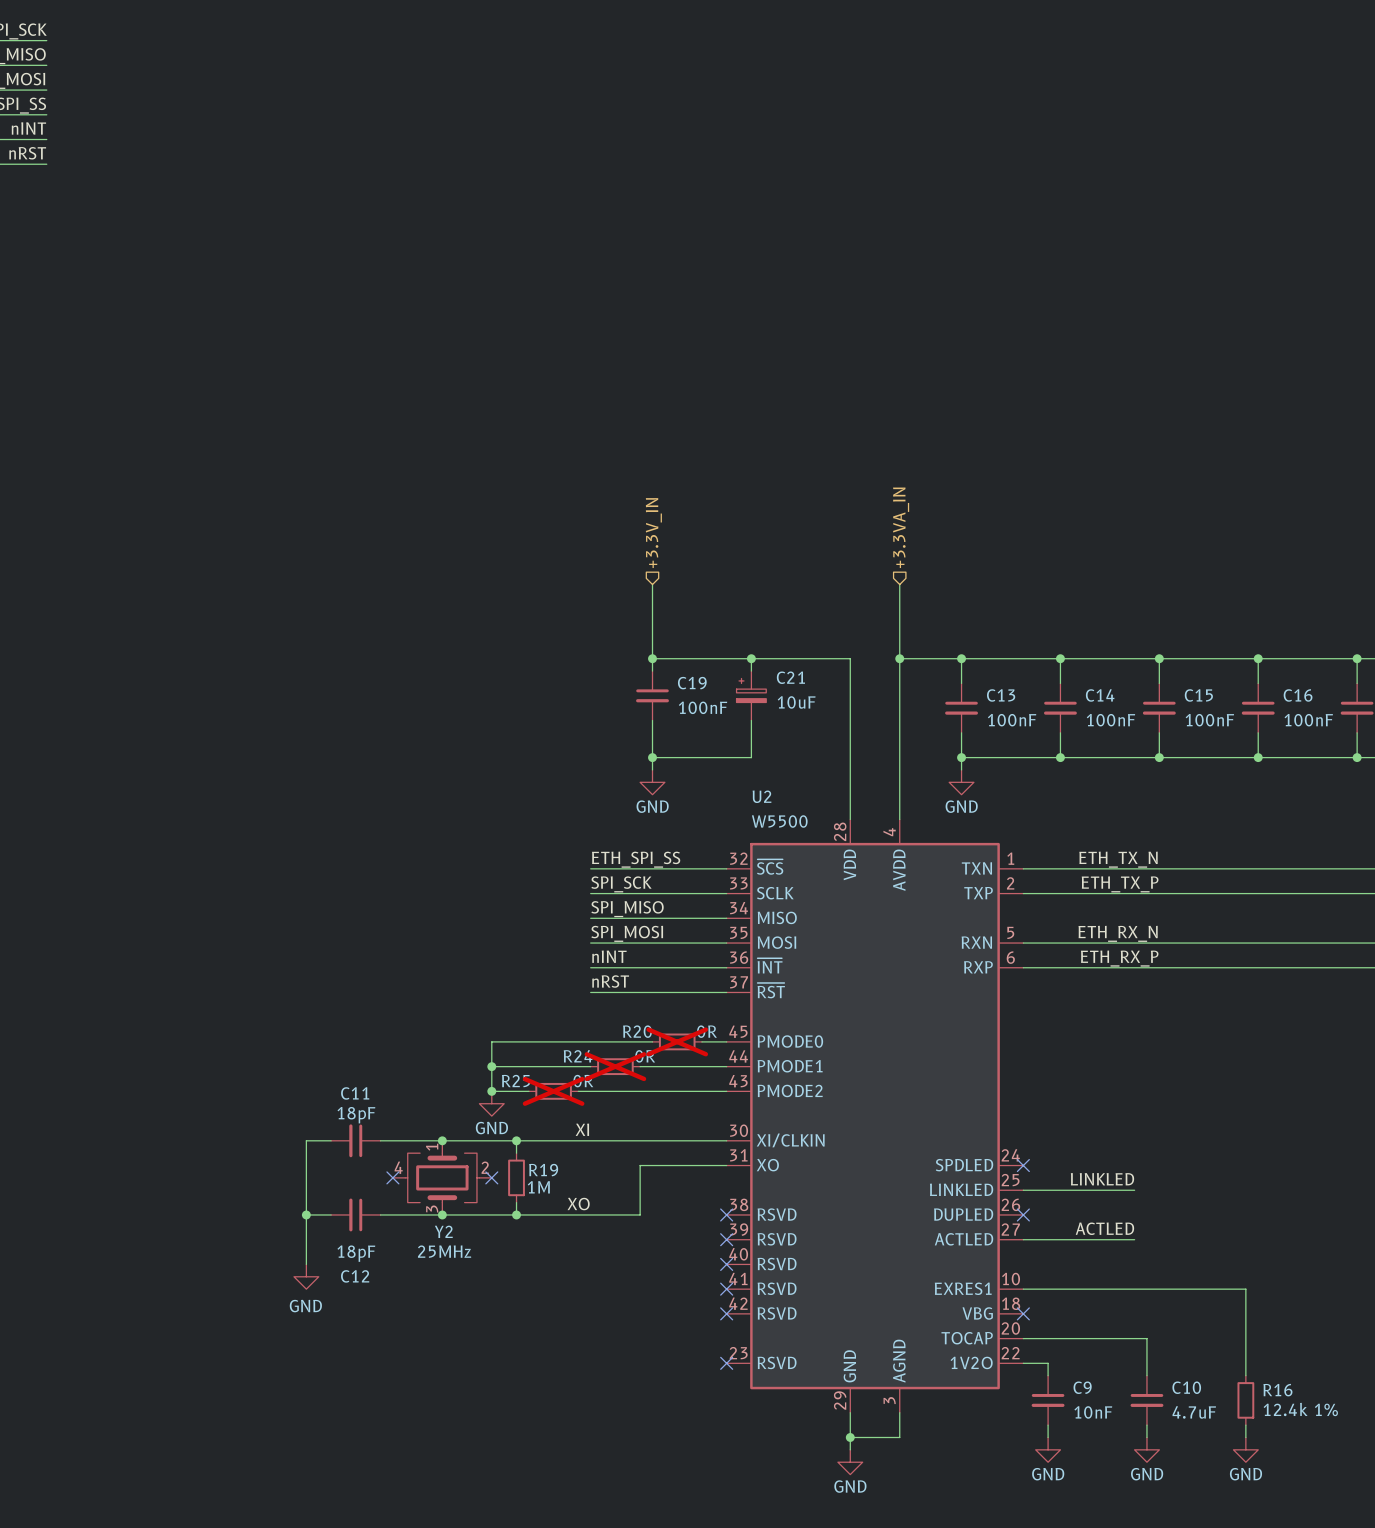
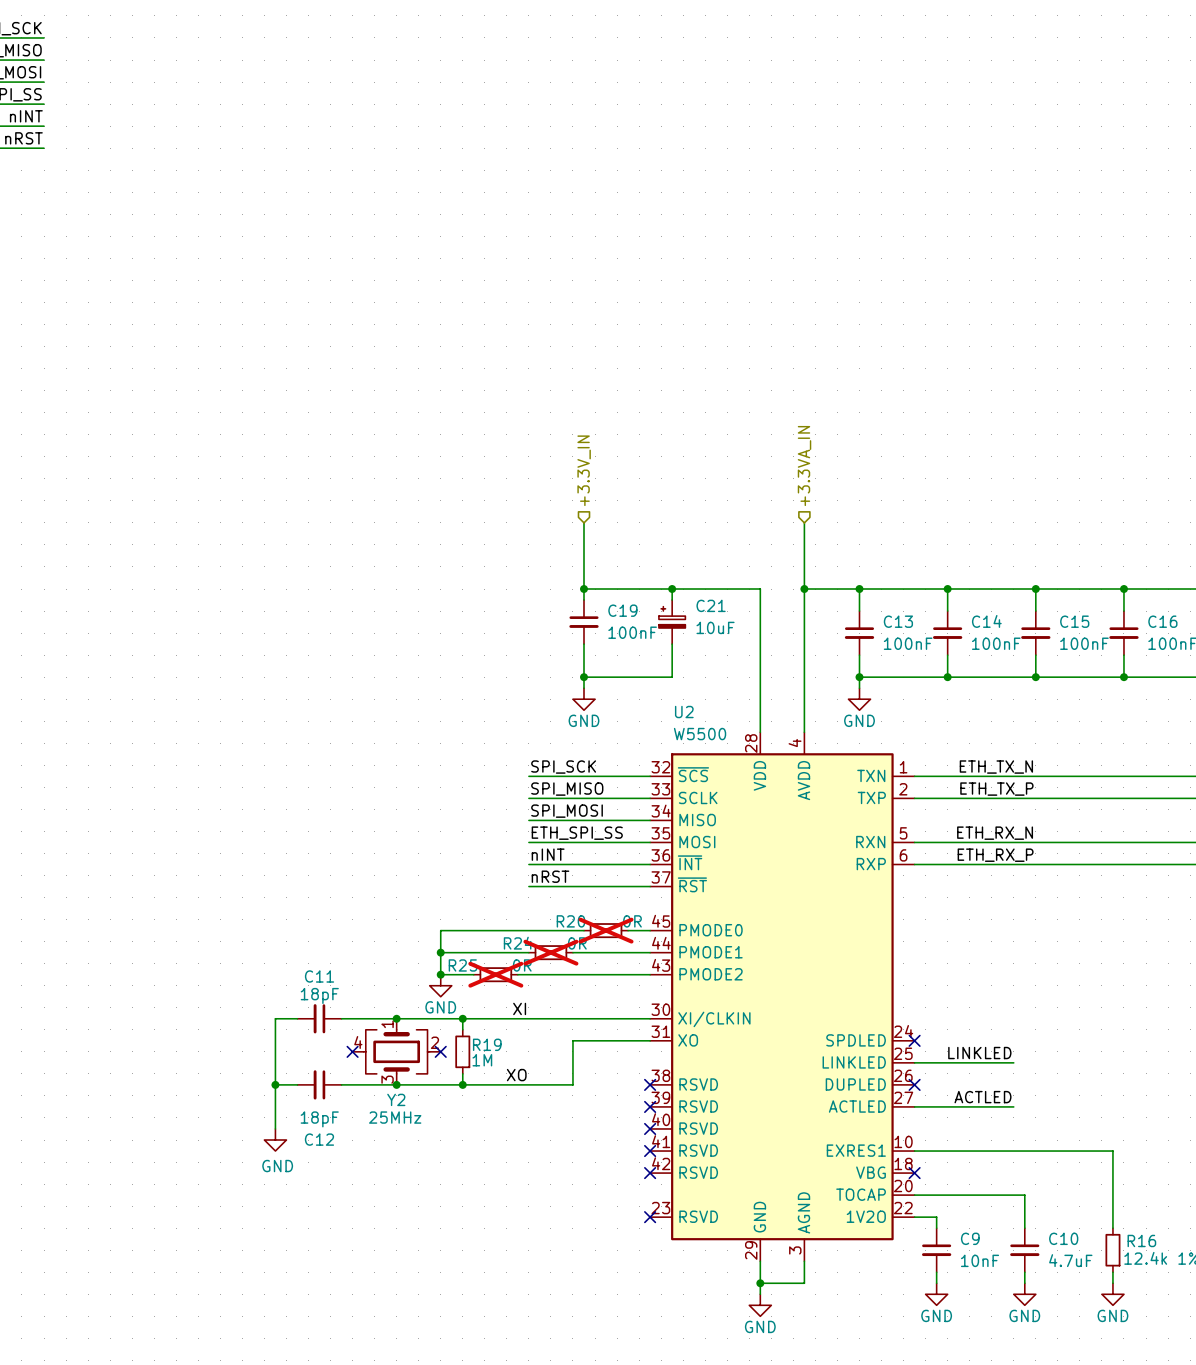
label: ETH_SPI_SS (636, 859) -> SPI_SCK (563, 767)
label: SPI_SCK (621, 884) -> SPI_MISO (567, 789)
label: SPI_MISO (627, 909) -> SPI_MOSI (567, 811)
label: SPI_MOSI (627, 933) -> ETH_SPI_SS (577, 833)

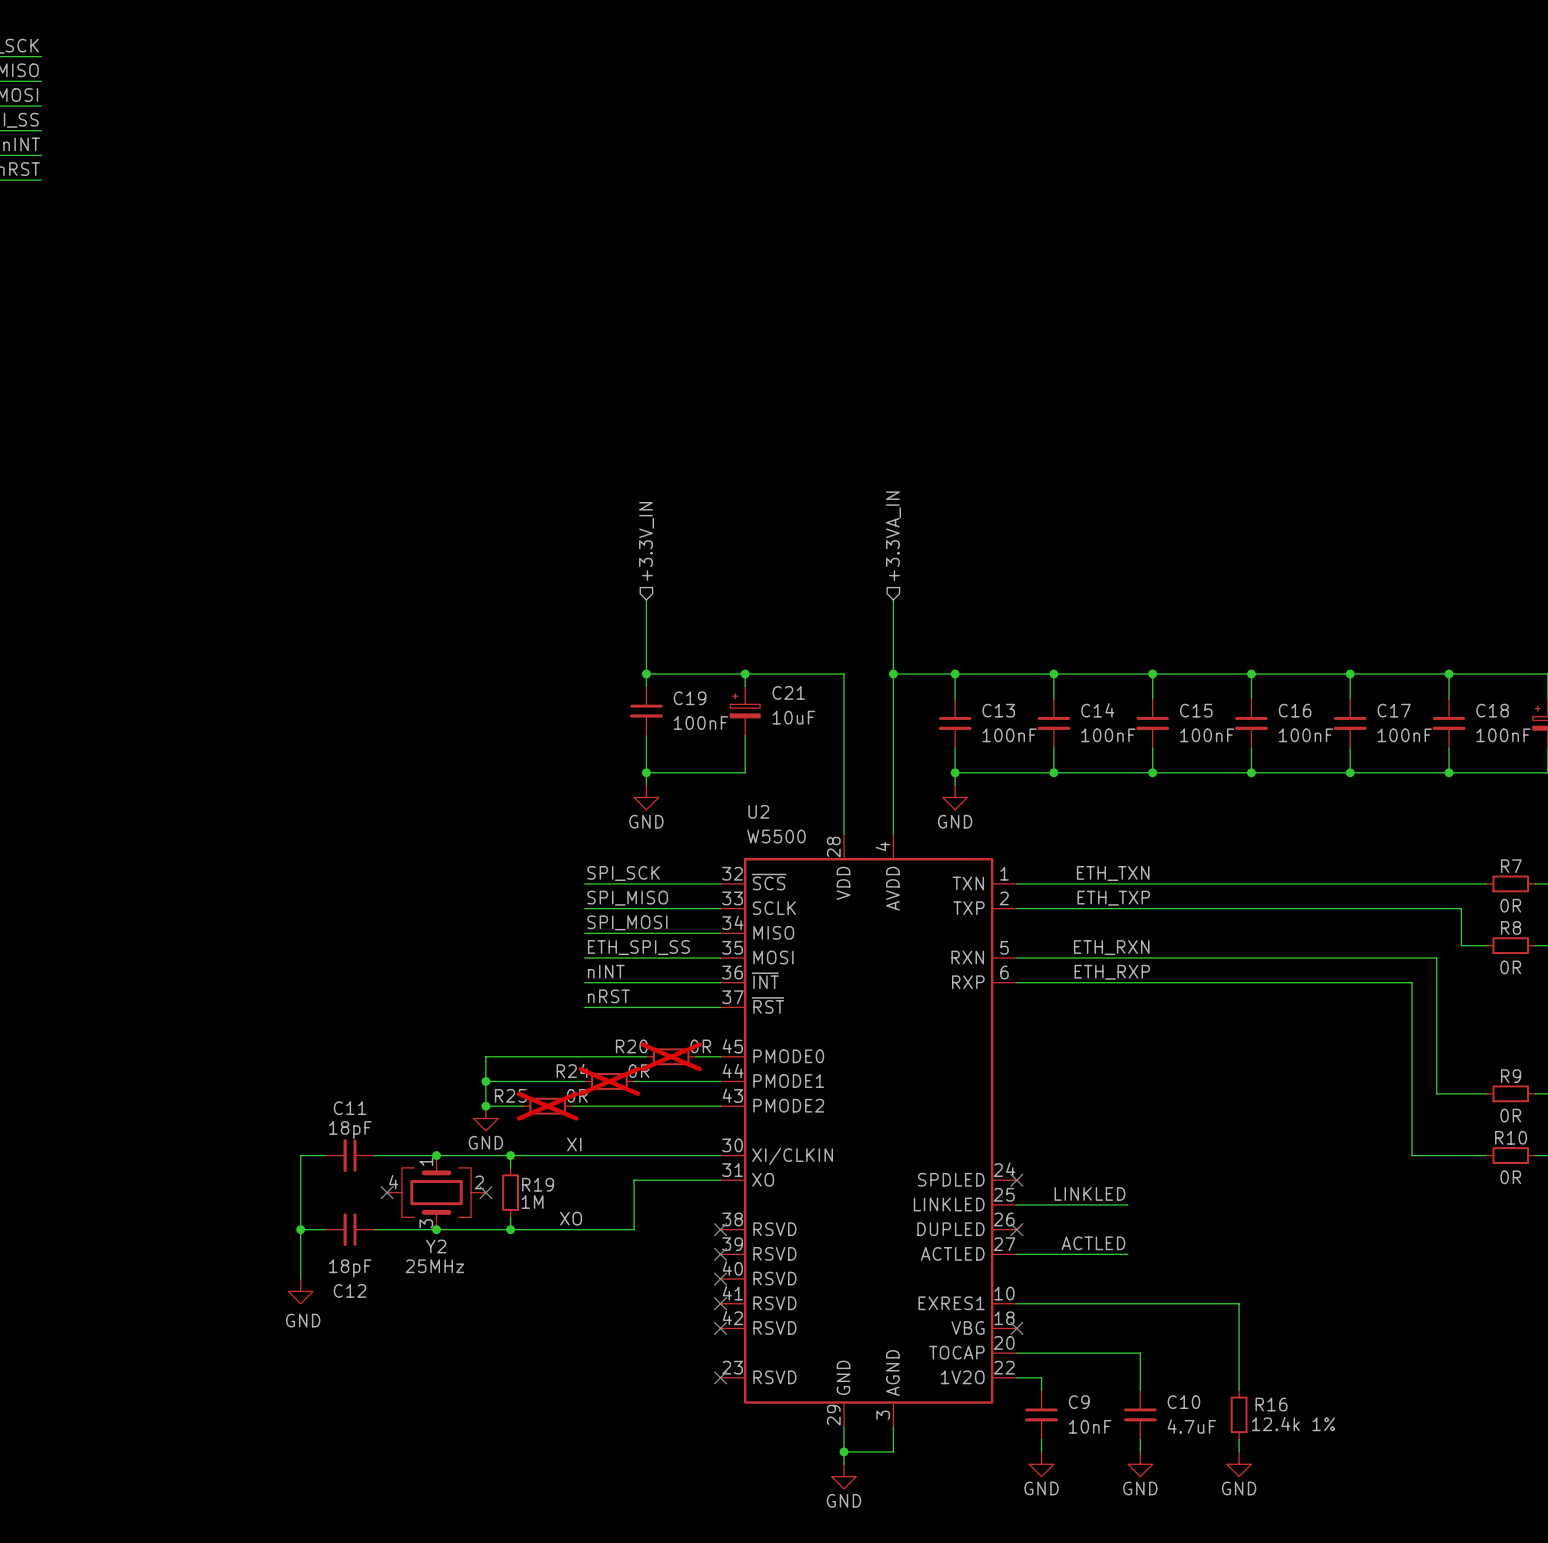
label: ETH_TX_N (996, 767) -> ETH_TXN (1113, 873)
label: ETH_TX_P (996, 789) -> ETH_TXP (1113, 898)
label: ETH_RX_N (995, 833) -> ETH_RXN (1111, 947)
label: ETH_RX_P (995, 855) -> ETH_RXP (1112, 972)

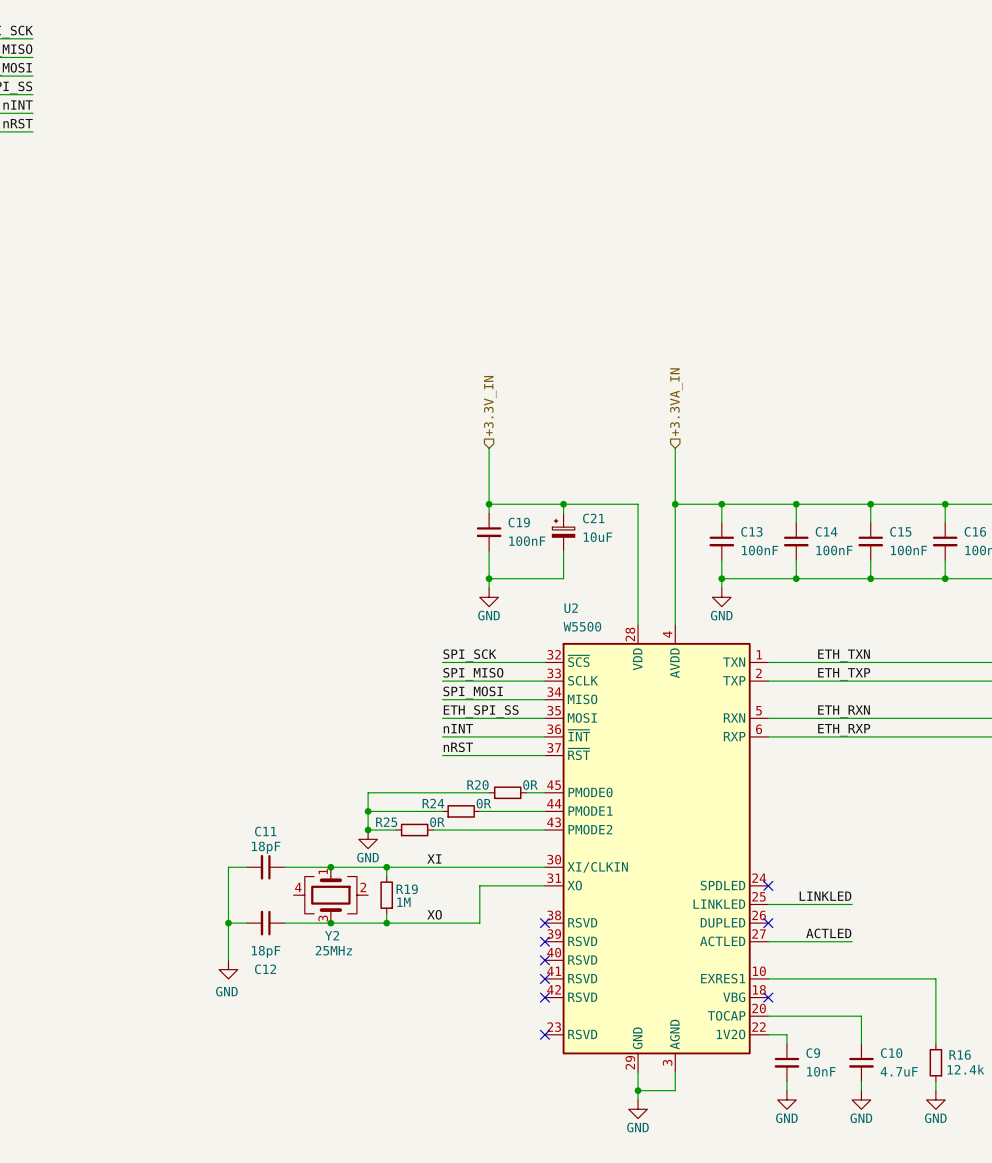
R20 do-not-place cross: (671, 1056) -> none
R24 do-not-place cross: (609, 1081) -> none
R25 do-not-place cross: (547, 1106) -> none
no-connect mark: (387, 1192) -> none
no-connect mark: (485, 1192) -> none

